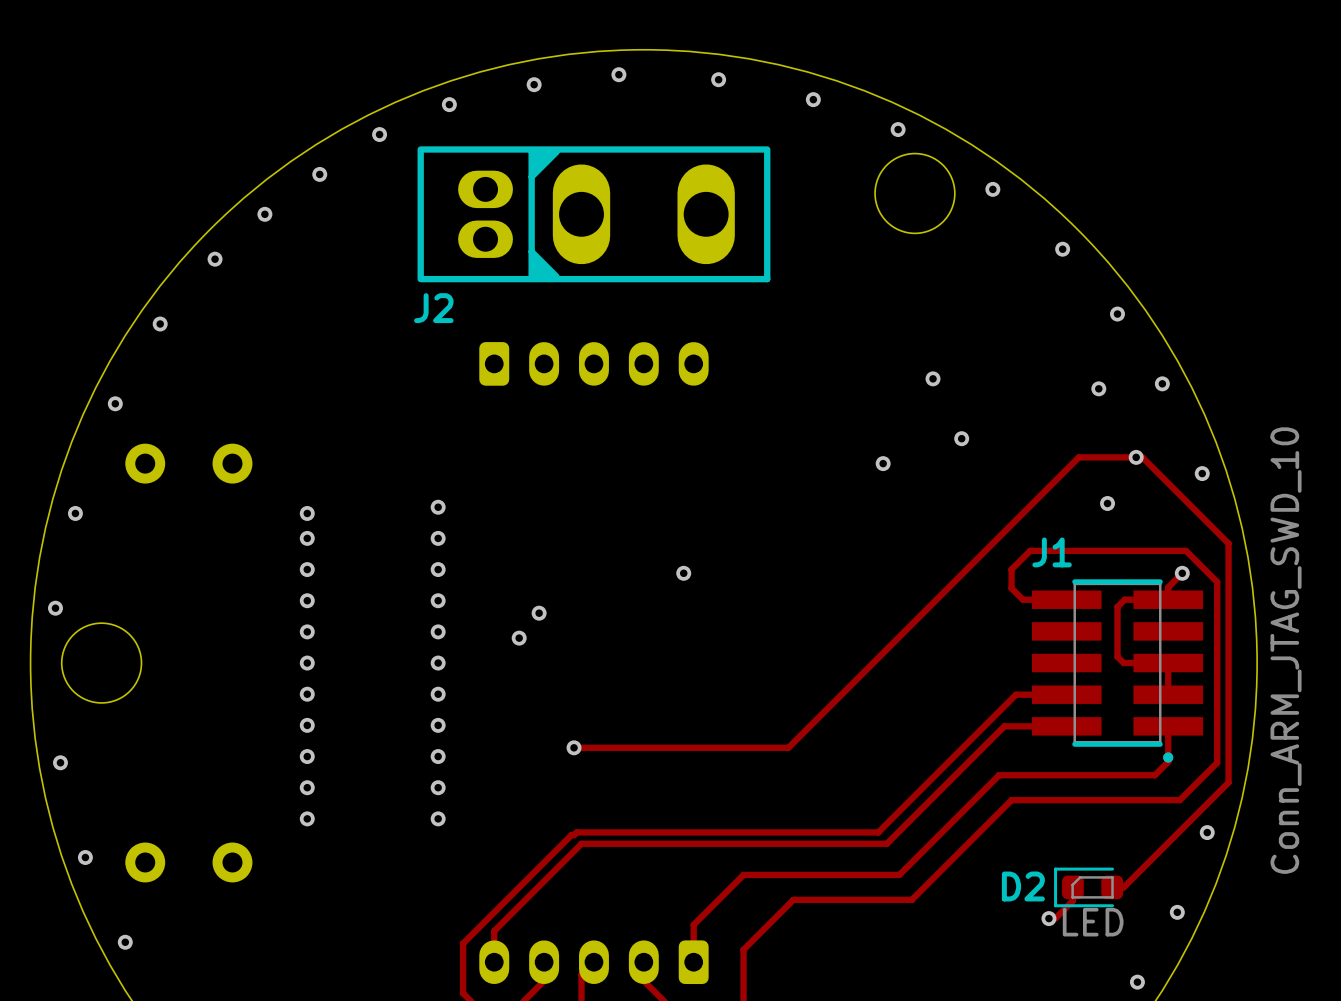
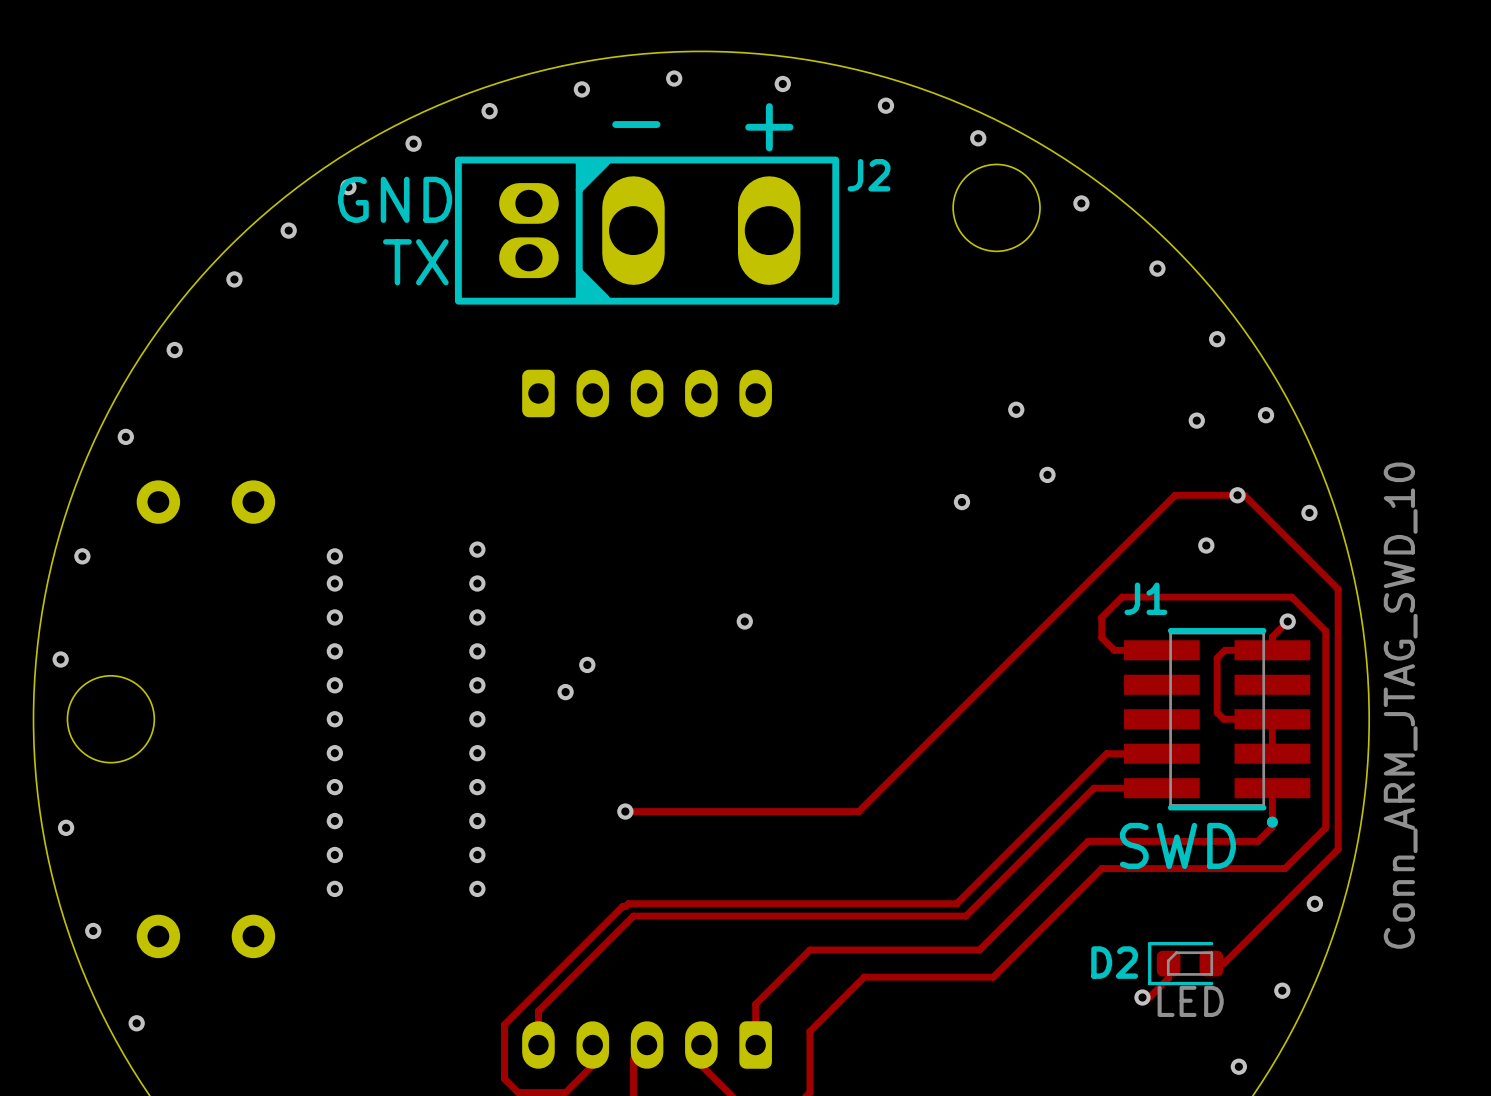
text: none -> - (636, 124)
text: none -> + (769, 127)
text: none -> GND (395, 199)
text: none -> TX (415, 262)
J2 name position: J2 (433, 308) -> J2 (869, 175)
text: none -> SWD (1177, 845)

